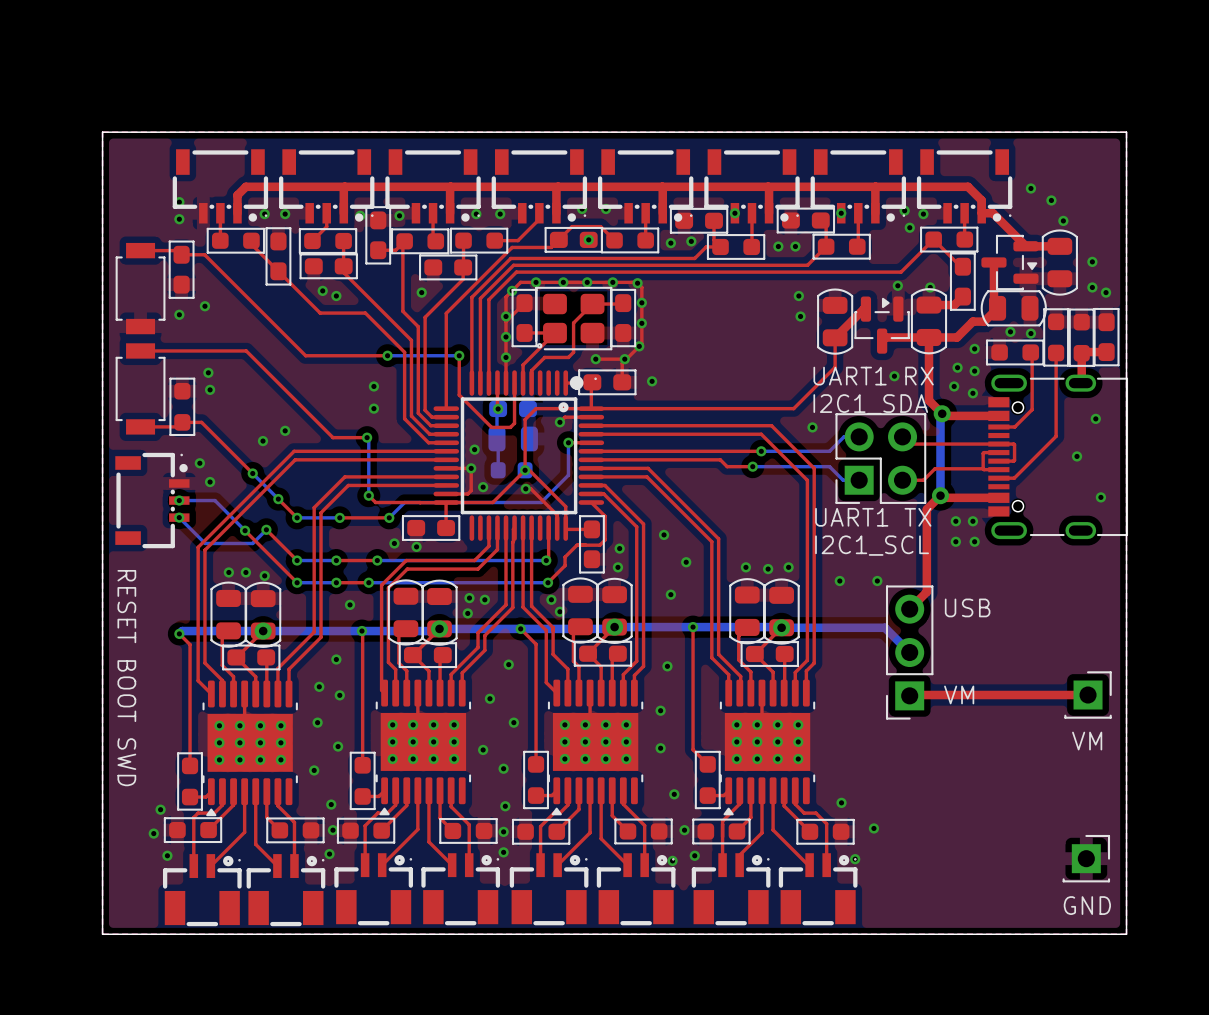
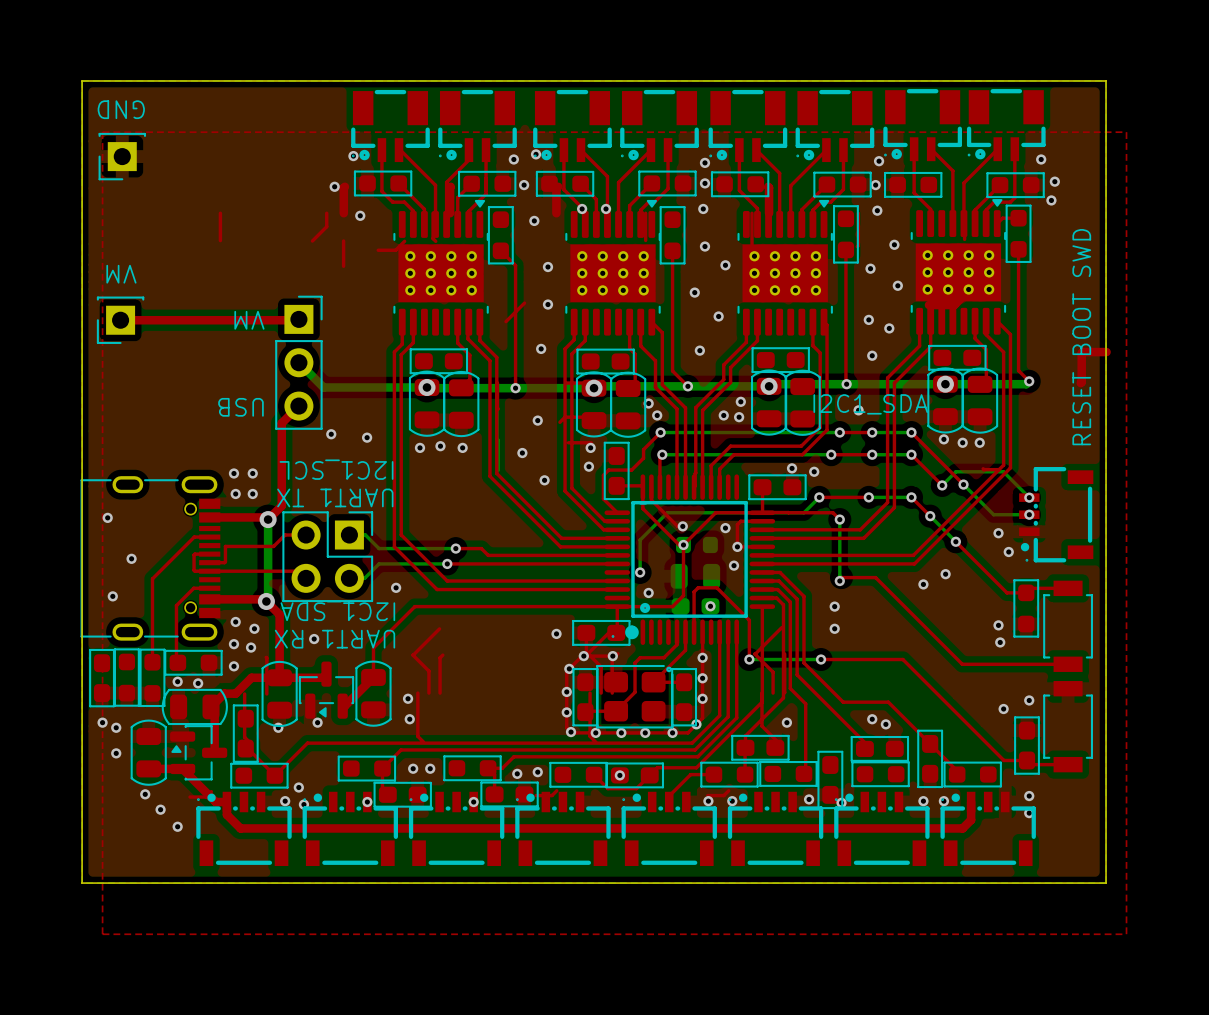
text: none -> GND (121, 109)
part: none -> (390, 125)
part: none -> (477, 125)
part: none -> (572, 125)
part: none -> (659, 125)
part: none -> (747, 125)
part: none -> (834, 125)
part: none -> (922, 125)
part: none -> (1006, 125)
board edge: (102, 132) (1126, 132) (1126, 934) (102, 934) (102, 132) -> (82, 80) (1106, 80) (1106, 883) (82, 883) (82, 80)
part footprint: [704, 149, 800, 224] -> [710, 171, 770, 198]
part footprint: [810, 149, 907, 224] -> [813, 171, 872, 198]
top track: none -> (914, 149) (914, 192) (930, 209) (930, 223)
top track: none -> (931, 149) (952, 170) (952, 223)
top track: none -> (997, 149) (963, 183) (963, 223)
top track: none -> (1014, 149) (1014, 197) (1010, 202) (994, 202) (986, 210) (986, 223)
top track: none -> (381, 150) (381, 191) (392, 202) (404, 202) (413, 211) (413, 224)
top track: none -> (399, 150) (435, 185) (435, 224)
top track: none -> (468, 150) (468, 160) (446, 182) (446, 224)
top track: none -> (486, 150) (486, 194) (468, 211) (468, 224)
top track: none -> (563, 150) (563, 189) (585, 211) (585, 224)
top track: none -> (581, 150) (607, 176) (607, 224)
top track: none -> (650, 150) (618, 182) (618, 224)
top track: none -> (668, 150) (668, 188) (654, 202) (648, 202) (640, 210) (640, 224)
top track: none -> (739, 150) (739, 190) (757, 208) (757, 224)
top track: none -> (756, 150) (779, 173) (779, 224)
top track: none -> (826, 150) (790, 185) (790, 224)
top track: none -> (843, 150) (843, 189) (830, 202) (821, 202) (812, 210) (812, 224)
via: none -> (536, 154)
part: none -> (122, 156)
via: none -> (353, 156)
via: none -> (513, 159)
via: none -> (1041, 159)
via: none -> (879, 161)
via: none -> (704, 162)
via: none -> (1054, 181)
part: none -> (383, 183)
top track: none -> (398, 183) (424, 209) (424, 224)
top track: none -> (471, 183) (457, 197) (457, 224)
part: none -> (487, 183)
part: none -> (565, 183)
top track: none -> (580, 183) (596, 199) (596, 224)
top track: none -> (651, 183) (629, 205) (629, 224)
part: none -> (667, 183)
via: none -> (704, 183)
top track: none -> (826, 184) (801, 209) (801, 224)
part: none -> (913, 184)
via: none -> (524, 185)
via: none -> (875, 185)
top track: none -> (1000, 185) (975, 210) (975, 223)
part: none -> (1015, 185)
part: (220, 186) -> none
part: (326, 186) -> none
via: none -> (334, 186)
part: (433, 186) -> none
part: (539, 186) -> none
part: (645, 186) -> none
top track: (662, 186) (662, 213) -> none
top track: (875, 186) (875, 213) -> none
part: (964, 186) -> none
via: (1030, 188) -> none
via: (179, 202) -> none
via: none -> (703, 208)
via: none -> (877, 210)
via: (904, 210) -> none
top track: (237, 213) (237, 195) (245, 186) (968, 186) (981, 200) (981, 213) (992, 213) (1026, 246) (1059, 246) -> none
top track: (539, 213) (539, 219) (517, 240) (494, 240) -> none
via: (734, 213) -> none
via: (841, 213) -> none
via: (264, 214) -> none
via: (285, 214) -> none
via: (476, 214) -> none
via: (500, 214) -> none
via: (923, 214) -> none
via: (399, 215) -> none
top track: none -> (1018, 218) (1002, 218) (997, 223)
via: (179, 219) -> none
via: none -> (534, 220)
part: (699, 220) -> none
top track: (714, 220) (714, 240) (720, 246) (706, 246) (694, 258) (510, 258) (471, 297) (471, 383) -> none
part: (805, 220) -> none
top track: (820, 220) (826, 225) (826, 246) (807, 265) (513, 265) (480, 298) (480, 383) -> none
via: (1063, 220) -> none
via: (909, 227) -> none
part: none -> (1018, 233)
part: (378, 235) -> none
part: none -> (672, 235)
part: (573, 239) -> none
via: (588, 239) -> none
part: (949, 239) -> none
part: (235, 240) -> none
top track: (251, 240) (251, 244) (320, 313) (365, 313) (404, 352) (404, 418) (428, 442) (446, 442) -> none
top track: (463, 240) (463, 279) (425, 317) (425, 410) (431, 417) (446, 417) -> none
part rotation: 0° (479, 240) -> 90° clockwise (500, 235)
top track: (614, 240) (600, 226) (572, 226) (551, 247) (512, 247) (446, 313) (446, 408) -> none
part: (630, 240) -> none
part: (328, 241) -> none
top track: (402, 241) (402, 311) (418, 326) (418, 413) (430, 425) (446, 425) -> none
part: (420, 241) -> none
via position: (691, 241) -> (704, 246)
via: (670, 243) -> none
via: none -> (894, 244)
part: (736, 246) -> none
via: (778, 246) -> none
via: (795, 246) -> none
part rotation: 0° (841, 246) -> 90° clockwise (845, 234)
top track: none -> (845, 249) (846, 384)
top track: none -> (1018, 249) (1018, 370) (1029, 381)
top track: (140, 250) (177, 250) (181, 254) (204, 254) (305, 355) (387, 355) -> none
top track: none -> (500, 250) (515, 265) (515, 388)
top track: none -> (672, 250) (672, 370) (687, 386)
part footprint: [419, 254, 478, 281] -> [393, 199, 489, 336]
part: (278, 256) -> none
via: (1092, 261) -> none
top track: (993, 262) (993, 304) (997, 308) (984, 321) (972, 321) (957, 337) (885, 337) (882, 341) -> none
part: (1009, 262) -> none
part: (1059, 262) -> none
via: none -> (725, 265)
part: (328, 266) -> none
top track: (343, 266) (343, 272) (411, 340) (411, 416) (429, 434) (446, 434) -> none
part: none -> (958, 266)
top track: (962, 266) (933, 239) (901, 272) (516, 272) (488, 299) (488, 383) -> none
via: none -> (547, 267)
part: none -> (613, 267)
part: none -> (785, 267)
via: none -> (870, 268)
part: (181, 269) -> none
text: none -> VM (121, 274)
part: (962, 281) -> none
via: (536, 282) -> none
via: (563, 282) -> none
via: (587, 282) -> none
via: (612, 282) -> none
via: (637, 283) -> none
via: (930, 287) -> none
via: (1092, 287) -> none
part: (140, 288) -> none
via: (322, 290) -> none
via: (512, 290) -> none
via: (421, 292) -> none
via: none -> (694, 292)
via: (1106, 292) -> none
via: (336, 296) -> none
via: (798, 296) -> none
via: (641, 302) -> none
top track: (623, 303) (592, 304) (573, 322) (573, 352) -> (585, 322) (585, 340) (573, 352)
via: none -> (547, 304)
via: (204, 306) -> none
part: (1013, 308) -> none
top track: (865, 309) (835, 337) (835, 367) (793, 408) (536, 408) (525, 419) (525, 470) -> none
via: (179, 314) -> none
via: (506, 316) -> none
via: none -> (718, 316)
via: (800, 316) -> none
part: (524, 318) -> none
part rotation: 0° (573, 318) -> 180° (634, 696)
part position: (573, 318) -> (634, 696)
part: (623, 318) -> none
top track: none -> (298, 319) (120, 320)
via: none -> (868, 319)
part: none -> (120, 320)
text: none -> VM (249, 320)
part: (835, 321) -> none
top track: none -> (919, 321) (919, 345) (887, 377) (887, 502) (860, 529) (762, 529)
part: (928, 321) -> none
top track: none -> (930, 321) (930, 346) (894, 383) (894, 507) (863, 538) (762, 538)
top track: none -> (975, 321) (975, 338) (986, 349) (986, 378) (980, 384)
top track: none -> (986, 321) (986, 334) (1003, 352) (1003, 465) (913, 555) (762, 555)
top track: none -> (997, 321) (1010, 334) (1010, 467) (914, 563) (762, 563)
top track: none -> (402, 322) (402, 344) (394, 352) (394, 546) (437, 589) (617, 589)
top track: none -> (413, 322) (413, 342) (401, 354) (401, 534) (447, 581) (617, 581)
top track: none -> (457, 322) (457, 343) (469, 355) (469, 379) (461, 387)
top track: none -> (468, 322) (467, 338) (489, 360) (489, 476) (560, 546) (617, 546)
top track: none -> (479, 322) (479, 340) (496, 357) (496, 473) (561, 538) (617, 538)
top track: none -> (574, 322) (574, 339) (565, 348) (565, 491) (603, 529) (617, 529)
top track: none -> (629, 322) (629, 348) (635, 354) (635, 381) (628, 388)
top track: none -> (640, 322) (640, 346) (655, 360) (655, 387) (677, 409) (677, 487)
top track: none -> (651, 322) (662, 332) (662, 384) (685, 407) (685, 487)
top track: none -> (746, 322) (746, 342) (723, 364) (723, 379) (695, 407) (694, 487)
top track: none -> (757, 322) (757, 340) (730, 367) (730, 382) (702, 410) (702, 487)
top track: none -> (812, 322) (812, 345) (820, 352) (820, 427) (801, 446) (730, 446) (711, 465) (711, 487)
top track: none -> (824, 322) (827, 325) (827, 430) (802, 454) (734, 454) (719, 469) (719, 487)
via: (641, 323) -> none
part: (882, 325) -> none
via: none -> (889, 328)
via: (1010, 331) -> none
top track: (524, 332) (554, 332) (523, 364) (523, 383) -> none
via: (1030, 333) -> none
via: (506, 336) -> none
top track: (928, 337) (928, 400) (944, 415) (998, 415) -> none
part: (1056, 337) -> none
part: (1081, 337) -> none
text: none -> RESET BOOT SWD (1081, 337)
part: (1106, 337) -> none
via: (639, 346) -> none
via: none -> (541, 348)
via: (974, 348) -> none
top track: (140, 350) (246, 350) (332, 437) (367, 437) -> none
via: none -> (699, 350)
part: (1015, 352) -> none
top track: (1030, 352) (1032, 409) (1014, 426) (998, 426) -> none
top track: (1056, 352) (1056, 436) (1014, 478) (998, 478) -> none
top track: (571, 354) (568, 357) (544, 357) (531, 370) (531, 383) -> (571, 354) (571, 488) (604, 521) (617, 521)
bottom track: (387, 355) (459, 355) -> none
via: (387, 355) -> none
top track: (459, 355) (459, 394) (491, 427) (510, 427) (514, 423) (514, 383) -> none
via: (459, 355) -> none
via: none -> (872, 355)
via: (506, 357) -> none
part: none -> (957, 357)
top track: (595, 359) (626, 359) -> (582, 656) (612, 656)
via: (595, 359) -> none
via: (624, 359) -> none
part: none -> (780, 360)
part: none -> (438, 361)
bottom track: none -> (298, 362) (323, 387) (594, 388) (595, 386) (769, 386) (771, 384) (1026, 384) (1029, 381)
part: none -> (298, 362)
via: (957, 367) -> none
via: (974, 371) -> none
via: (208, 372) -> none
text: UART1 RX (873, 376) -> none
via: (894, 376) -> none
via: (652, 381) -> none
via: none -> (1029, 381)
top track: (592, 382) (591, 408) -> none
part position: (607, 382) -> (605, 361)
top track: (622, 382) (622, 363) (641, 343) (641, 287) (636, 282) (520, 282) (506, 297) (506, 383) -> none
via: none -> (846, 384)
via: (373, 386) -> none
via: none -> (687, 386)
via: none -> (769, 386)
via: (954, 386) -> none
via: none -> (426, 387)
part: (140, 388) -> none
via: none -> (515, 388)
via: none -> (594, 388)
via: (210, 389) -> none
via: (972, 393) -> none
part: none -> (945, 400)
part: none -> (980, 400)
via: none -> (740, 401)
part: none -> (769, 402)
part: none -> (802, 402)
part: none -> (426, 403)
via: none -> (648, 403)
part: none -> (461, 404)
part: none -> (594, 404)
part: none -> (628, 404)
part: (182, 406) -> none
top track: none -> (298, 406) (281, 423) (281, 505) (268, 519) (265, 517) (209, 517)
text: none -> USB (240, 407)
via: (373, 408) -> none
via: (498, 408) -> none
part position: (513, 408) -> (695, 606)
via: none -> (858, 410)
bottom track: (942, 413) (940, 415) (940, 495) -> none
via position: (942, 413) -> (945, 384)
via: none -> (657, 415)
via: none -> (723, 415)
via: none -> (739, 417)
via: (1095, 418) -> none
via: none -> (537, 420)
via: (559, 422) -> none
top track: (591, 425) (771, 425) (814, 468) (814, 663) (806, 671) (806, 693) -> none
top track: (140, 426) (177, 426) (182, 422) (201, 422) (252, 473) -> none
via: (812, 427) -> none
via: (285, 430) -> none
top track: none -> (660, 432) (643, 449) (643, 458) (631, 470) (608, 470) (603, 475) (603, 498) (617, 512)
via: none -> (660, 432)
top track: none -> (839, 432) (872, 432)
via: none -> (839, 432)
bottom track: none -> (872, 432) (911, 432)
via: none -> (872, 432)
top track: none -> (911, 432) (963, 484)
via: none -> (911, 432)
via: none -> (331, 434)
top track: (591, 434) (761, 434) (807, 480) (807, 660) (795, 672) (795, 693) -> none
bottom track: (859, 436) (843, 436) (829, 451) (761, 451) -> none
top track: (902, 436) (909, 444) (1013, 444) (1014, 460) (998, 461) -> none
bottom track: (367, 437) (368, 439) (368, 495) -> none
part position: (513, 438) -> (695, 576)
via: none -> (943, 439)
via: (262, 441) -> none
bottom track: (568, 442) (568, 475) (541, 502) (404, 502) (389, 517) -> none
via: (568, 442) -> none
via: none -> (962, 442)
via: none -> (979, 442)
via: none -> (440, 446)
via: none -> (419, 447)
via: none -> (462, 447)
via: none -> (590, 447)
via: (474, 449) -> none
top track: (446, 451) (294, 451) (198, 547) (198, 680) (211, 693) -> none
top track: (591, 451) (761, 451) -> (447, 563) (617, 563)
via: (761, 451) -> none
top track: (998, 452) (983, 453) (983, 468) (934, 468) (923, 480) (902, 480) -> none
via: none -> (522, 453)
top track: none -> (662, 454) (659, 457) (659, 487)
via: none -> (662, 454)
top track: none -> (831, 454) (872, 454)
via: none -> (831, 454)
bottom track: none -> (872, 454) (911, 454)
via: none -> (872, 454)
top track: none -> (911, 454) (942, 485)
via: none -> (911, 454)
part rotation: 0° (518, 455) -> 180° (689, 559)
part position: (518, 455) -> (689, 559)
part: (1058, 456) -> none
via: (1077, 456) -> none
part: (880, 458) -> none
top track: (446, 459) (295, 459) (204, 550) (204, 663) (222, 680) (222, 693) -> none
top track: (591, 459) (720, 459) (727, 466) (752, 466) -> none
via: (199, 463) -> none
via: none -> (588, 466)
bottom track: (752, 466) (829, 466) (843, 480) (859, 480) -> none
via: (752, 466) -> none
top track: (446, 468) (471, 468) (471, 490) (467, 493) (446, 493) -> none
via: (471, 468) -> none
top track: (591, 468) (648, 468) (718, 538) (718, 654) (740, 676) (739, 693) -> none
via: none -> (792, 468)
part position: (511, 470) -> (696, 544)
top track: (525, 470) (492, 502) (446, 502) -> none
top track: (525, 470) (529, 470) (565, 506) (567, 529) (591, 529) -> none
via: (525, 470) -> none
part: none -> (616, 470)
via: none -> (814, 471)
via: none -> (233, 473)
bottom track: (252, 473) (278, 499) -> none
top track: (446, 476) (344, 476) (314, 507) (314, 632) (277, 668) (277, 693) -> none
top track: (591, 476) (646, 476) (711, 541) (711, 657) (728, 674) (728, 693) -> none
via: none -> (544, 480)
via: (210, 482) -> none
bottom track: none -> (963, 484) (993, 514) (1029, 514)
via: none -> (963, 484)
top track: (446, 485) (348, 485) (321, 512) (321, 637) (289, 669) (289, 693) -> none
top track: (591, 485) (604, 485) (643, 524) (643, 666) (634, 675) (634, 693) -> none
top track: none -> (616, 485) (641, 485) (642, 508) (679, 544) (683, 544)
bottom track: none -> (942, 485) (955, 471) (1003, 471) (1029, 497)
via: (483, 487) -> none
top track: none -> (651, 487) (651, 500) (677, 526) (682, 526)
top track: none -> (762, 487) (762, 512) (788, 512)
part: none -> (777, 487)
via size: [931, 487, 950, 505] -> [937, 480, 948, 491]
top track: (525, 488) (530, 488) (557, 515) (557, 528) -> none
via: (525, 488) -> none
via: none -> (235, 493)
via: none -> (252, 493)
top track: (591, 493) (603, 493) (636, 526) (636, 661) -> (677, 632) (677, 644) (663, 657) (640, 657) (636, 661)
top track: (368, 495) (375, 502) (419, 502) -> none
via: (368, 495) -> none
top track: none -> (819, 497) (868, 497)
bottom track: none -> (819, 497) (803, 512) (667, 512) (640, 540) (640, 572)
via: none -> (819, 497)
bottom track: none -> (868, 497) (911, 497)
via: none -> (868, 497)
top track: none -> (911, 497) (930, 516)
via: none -> (911, 497)
top track: (998, 497) (942, 497) (940, 495) (926, 509) (926, 592) (909, 609) -> none
via: none -> (1029, 497)
via: (1100, 497) -> none
top track: (278, 499) (297, 517) -> none
via: (278, 499) -> none
part: (152, 500) -> none
bottom track: (179, 500) (214, 500) (245, 530) -> none
via: (179, 500) -> none
top track: (420, 502) (446, 502) (446, 528) -> none
top track: (591, 502) (605, 516) (605, 539) (599, 545) (576, 545) (565, 557) (565, 565) (547, 582) -> none
top track: none -> (762, 512) (715, 512) (683, 544)
top track: none -> (788, 512) (832, 512) (839, 519)
via: none -> (1029, 514)
part: none -> (1056, 514)
bottom track: none -> (930, 516) (955, 541)
via: none -> (930, 516)
via: none -> (107, 517)
bottom track: (179, 517) (205, 543) (252, 543) (266, 529) -> none
via: (179, 517) -> none
bottom track: (297, 517) (339, 517) -> none
via: (297, 517) -> none
top track: (339, 517) (389, 517) -> none
via: (339, 517) -> none
via: (389, 517) -> none
text rotation: 0° (873, 517) -> 180° (335, 497)
text position: UART1 TX (873, 517) -> UART1 TX (335, 497)
bottom track: none -> (268, 519) (268, 599) (266, 601)
bottom track: none -> (839, 519) (839, 575) (841, 577)
via: none -> (839, 519)
top track: none -> (762, 521) (740, 521) (737, 524) (737, 546) (762, 546)
via: (955, 521) -> none
via: (972, 521) -> none
via size: [261, 524, 272, 535] -> [259, 511, 277, 529]
via: none -> (682, 526)
part: (431, 528) -> none
top track: (488, 528) (488, 546) (474, 560) (406, 560) (381, 585) (381, 690) (384, 693) -> none
top track: (497, 528) (497, 549) (478, 569) (407, 569) (388, 587) (388, 662) (395, 669) (395, 693) -> none
top track: (506, 528) (506, 604) (478, 632) (478, 647) (451, 674) (451, 693) -> none
top track: (514, 528) (512, 607) (484, 635) (484, 650) (462, 673) (462, 693) -> none
top track: (523, 528) (523, 607) (546, 630) (546, 682) (556, 693) -> none
top track: (531, 528) (531, 606) (553, 627) (553, 654) (567, 669) (567, 693) -> none
top track: (548, 528) (548, 558) (546, 560) -> none
via: none -> (725, 528)
top track: (266, 529) (297, 560) -> none
top track: (245, 530) (297, 582) -> none
via: (245, 530) -> none
via: none -> (998, 533)
via: (664, 534) -> none
top track: none -> (306, 535) (285, 535) (273, 546) (225, 546) (225, 561) (209, 562)
bottom track: none -> (349, 535) (365, 535) (379, 548) (455, 548)
top track: none -> (209, 537) (194, 537) (152, 578) (152, 662)
top track: none -> (955, 541) (1006, 592) (1026, 592) (1030, 588) (1068, 588)
via: (974, 541) -> none
via: (394, 543) -> none
part: (591, 544) -> none
top track: none -> (683, 544) (683, 595) (672, 606) (414, 606) (373, 648) (373, 677) (342, 706)
via: none -> (683, 544)
text rotation: 0° (872, 545) -> 180° (336, 469)
text position: I2C1_SCL (872, 545) -> I2C1_SCL (336, 469)
via: (416, 546) -> none
via: none -> (737, 546)
top track: none -> (455, 548) (481, 548) (488, 555) (617, 555)
via: none -> (455, 548)
via: (619, 548) -> none
via: none -> (1008, 552)
top track: none -> (209, 554) (194, 554) (194, 571) (298, 571) (306, 578)
part: none -> (327, 556)
via: none -> (131, 558)
part: none -> (150, 558)
bottom track: (297, 560) (336, 560) -> none
via: (297, 560) -> none
top track: (336, 560) (377, 560) -> none
via: (336, 560) -> none
bottom track: (377, 560) (546, 560) -> (662, 454) (831, 454)
via: (377, 560) -> none
via: (546, 560) -> none
via: (686, 562) -> none
bottom track: none -> (447, 563) (379, 563) (364, 578) (349, 578)
via: none -> (447, 563)
via: none -> (734, 565)
via: (617, 567) -> none
via: (745, 567) -> none
via: (788, 567) -> none
via: (768, 569) -> none
via: (228, 572) -> none
via: (245, 572) -> none
via: none -> (640, 572)
top track: none -> (762, 572) (780, 572) (803, 596) (803, 662) (843, 702) (888, 702) (957, 770) (957, 774)
via: none -> (945, 574)
via: (264, 575) -> none
top track: none -> (841, 577) (875, 577) (962, 664) (1068, 664)
top track: none -> (762, 581) (778, 581) (797, 599) (797, 674) (864, 742) (864, 748)
via: (877, 581) -> none
bottom track: (297, 582) (336, 582) -> none
via: (297, 582) -> none
top track: (336, 582) (368, 582) -> none
via: (336, 582) -> none
bottom track: (368, 582) (547, 582) -> (660, 432) (839, 432)
via: (368, 582) -> none
via: (547, 582) -> none
via: none -> (923, 584)
via: none -> (396, 587)
top track: none -> (209, 588) (193, 588) (176, 605) (177, 662)
top track: none -> (762, 589) (777, 589) (790, 602) (790, 688) (805, 703) (805, 773)
via: none -> (648, 592)
via: (670, 594) -> none
via: none -> (112, 596)
via: (469, 598) -> none
top track: none -> (762, 598) (776, 598) (783, 604) (783, 697) (745, 735) (745, 774)
top track: none -> (209, 599) (264, 599) (279, 614) (279, 677)
via: (484, 599) -> none
via: (551, 599) -> none
via: (350, 604) -> none
top track: none -> (617, 606) (616, 632)
via: none -> (710, 606)
top track: none -> (762, 606) (762, 701) (696, 767) (657, 767) (636, 788) (607, 788) (594, 774)
via: none -> (834, 606)
text: USB (967, 607) -> none
part: none -> (1026, 608)
text: none -> I2C1_SDA (337, 610)
part: (580, 610) -> none
part: (614, 610) -> none
via: (559, 611) -> none
part: (747, 611) -> none
part: (781, 611) -> none
part: (405, 612) -> none
part: (439, 612) -> none
via: (467, 613) -> none
part: (228, 614) -> none
part: (263, 614) -> none
via: none -> (235, 621)
via: none -> (998, 625)
top track: (580, 626) (573, 633) (573, 661) (578, 666) (578, 693) -> none
part: none -> (1068, 626)
via: (614, 627) -> none
top track: (693, 627) (693, 749) (707, 764) -> none
via: (693, 627) -> none
top track: (747, 627) (738, 635) (738, 659) (750, 672) (750, 693) -> none
via: (781, 627) -> none
via: none -> (254, 628)
top track: (405, 628) (398, 635) (398, 663) (406, 671) (406, 693) -> none
via: (439, 628) -> none
top track: (520, 628) (536, 644) (536, 764) -> none
via: (520, 628) -> none
via: none -> (834, 628)
top track: (228, 630) (222, 637) (222, 665) (233, 676) (233, 693) -> none
top track: (263, 631) (236, 657) (255, 676) (255, 693) -> none
via position: (263, 631) -> (266, 601)
top track: (361, 631) (362, 765) -> none
via: (361, 631) -> none
top track: none -> (685, 632) (685, 650) (653, 682) (684, 682)
top track: none -> (694, 632) (694, 591) (698, 587) (716, 587) (749, 620) (749, 659)
top track: none -> (702, 632) (702, 718) (687, 732) (571, 732) (566, 727) (566, 671) (586, 651) (586, 632)
top track: none -> (719, 632) (719, 715) (692, 743) (307, 743) (274, 775) (245, 748)
top track: none -> (728, 632) (728, 716) (694, 749) (401, 749) (382, 768) (382, 789) (387, 794)
top track: none -> (736, 632) (736, 717) (697, 756) (513, 756) (502, 768) (488, 768) (494, 774) (494, 794)
top track: (179, 633) (190, 644) (190, 765) -> none
bottom track: (179, 633) (182, 631) (437, 631) (439, 628) (612, 628) (614, 627) (884, 627) (909, 652) -> none
via: (179, 633) -> none
via: none -> (556, 633)
via: none -> (314, 639)
text: none -> UART1 RX (335, 639)
via: none -> (1000, 642)
via: none -> (233, 644)
via: none -> (251, 647)
part: (909, 652) -> none
part position: (602, 653) -> (601, 632)
part: (769, 654) -> none
part: (427, 655) -> none
via: none -> (583, 656)
via: none -> (612, 656)
part: (251, 657) -> none
via: none -> (702, 657)
via: (336, 659) -> none
bottom track: none -> (749, 659) (821, 659)
via: none -> (749, 659)
top track: none -> (821, 659) (902, 659) (1003, 760) (1027, 760) (1031, 764) (1068, 764)
via: none -> (821, 659)
part: none -> (193, 662)
top track: (635, 662) (623, 674) (623, 693) -> (635, 662) (635, 692) (616, 711) (585, 712)
via: (508, 664) -> none
via: none -> (233, 666)
via: (667, 666) -> none
via: none -> (569, 668)
top track: none -> (326, 674) (322, 677) (251, 677) (235, 693) (224, 693) (211, 706) (214, 710) (214, 752)
part: none -> (126, 677)
part: none -> (152, 677)
part: none -> (102, 678)
text: RESET BOOT SWD (126, 678) -> none
via: none -> (702, 678)
part footprint: [719, 679, 816, 816] -> [731, 734, 790, 761]
via: none -> (177, 681)
via: none -> (198, 683)
via: (319, 686) -> none
part: none -> (326, 690)
via: none -> (566, 691)
part: none -> (279, 693)
part: none -> (373, 693)
text: VM (959, 694) -> none
via: (339, 695) -> none
top track: (1088, 695) (909, 695) -> none
part: (1088, 695) -> none
part: none -> (585, 697)
part: none -> (684, 697)
via: none -> (408, 698)
via: (489, 698) -> none
via: none -> (702, 698)
via: none -> (1029, 700)
part: none -> (194, 706)
via: none -> (1003, 709)
via: (660, 710) -> none
via: none -> (566, 712)
via: none -> (409, 719)
via: none -> (872, 719)
via: none -> (102, 722)
via: (513, 722) -> none
via: none -> (786, 722)
via: none -> (696, 724)
via: none -> (885, 724)
part: none -> (1068, 726)
via: none -> (116, 727)
via: none -> (278, 727)
via: none -> (571, 732)
via: none -> (595, 732)
via: none -> (621, 732)
via: none -> (645, 732)
via: none -> (672, 732)
part: none -> (245, 733)
text: VM (1087, 741) -> none
part: none -> (1027, 745)
via: (338, 746) -> none
part: (423, 747) -> none
part: (595, 747) -> none
part: (250, 748) -> none
via: (660, 748) -> none
part: none -> (879, 748)
via: (483, 749) -> none
part: none -> (148, 752)
part: none -> (198, 752)
via: none -> (116, 753)
part: none -> (930, 758)
top track: none -> (148, 768) (182, 768) (215, 802) (226, 802) (226, 814) (240, 828) (962, 828) (971, 820) (971, 802)
via: none -> (413, 768)
via: none -> (430, 768)
part: none -> (472, 768)
via position: (503, 768) -> (517, 773)
via: (314, 770) -> none
via: none -> (537, 772)
part: none -> (788, 773)
part: none -> (578, 774)
top track: none -> (713, 774) (690, 774) (669, 796) (669, 802)
part: none -> (880, 774)
part: none -> (972, 774)
part: none -> (259, 775)
via: none -> (619, 775)
part: none -> (634, 775)
part: (536, 779) -> none
part: none -> (830, 779)
part rotation: 0° (362, 780) -> 90° clockwise (366, 768)
part rotation: 0° (707, 780) -> 90° clockwise (729, 774)
part: (190, 781) -> none
via: none -> (298, 787)
top track: (384, 790) (378, 796) (362, 796) -> none
top track: (395, 790) (395, 805) (387, 813) (377, 813) (365, 825) (365, 865) -> none
top track: (406, 790) (406, 805) (381, 830) -> none
top track: (417, 790) (417, 829) (382, 865) -> none
top track: (428, 790) (428, 841) (452, 865) -> none
top track: (440, 790) (440, 818) (452, 830) -> none
top track: (451, 790) (451, 806) (469, 824) (469, 865) -> none
top track: (567, 790) (567, 805) (559, 813) (553, 813) (540, 826) (540, 865) -> none
top track: (578, 790) (578, 809) (556, 831) -> none
top track: (590, 790) (590, 832) (557, 865) -> none
top track: (601, 790) (601, 838) (627, 865) -> none
top track: (612, 790) (612, 815) (627, 831) -> none
top track: (623, 790) (623, 804) (644, 825) (644, 865) -> none
top track: (739, 790) (739, 803) (722, 821) (722, 865) -> none
top track: (750, 790) (750, 817) (736, 831) -> none
top track: (761, 790) (761, 832) (739, 855) (739, 865) -> none
top track: (773, 790) (773, 830) (809, 865) -> none
top track: (784, 790) (784, 806) (809, 831) -> none
top track: (795, 790) (795, 804) (804, 813) (815, 813) (826, 823) (826, 865) -> none
top track: (222, 791) (222, 805) (214, 813) (198, 813) (193, 817) (193, 866) -> none
top track: (233, 791) (233, 805) (208, 830) -> none
top track: (244, 791) (244, 832) (210, 866) -> none
top track: (255, 791) (255, 844) (277, 866) -> none
top track: (266, 791) (266, 817) (279, 830) -> none
top track: (277, 791) (277, 805) (294, 822) (294, 866) -> none
via: none -> (145, 794)
part: none -> (402, 794)
part: none -> (509, 794)
via: (674, 794) -> none
via: none -> (1029, 796)
via: none -> (809, 799)
via: none -> (285, 801)
via: none -> (708, 801)
via: none -> (732, 801)
via: none -> (923, 801)
via: none -> (943, 801)
via: none -> (367, 802)
via: none -> (473, 802)
via: none -> (303, 804)
via: (331, 804) -> none
via: (505, 806) -> none
via: none -> (1029, 813)
part footprint: [336, 817, 396, 844] -> [302, 791, 399, 867]
part footprint: [439, 818, 498, 844] -> [408, 791, 505, 867]
via: none -> (177, 826)
part: none -> (243, 828)
part: none -> (562, 828)
part: none -> (669, 828)
part: none -> (775, 828)
via: (873, 828) -> none
part: none -> (881, 828)
part: none -> (988, 828)
part: (193, 830) -> none
part: (295, 830) -> none
via: (332, 830) -> none
via: (684, 830) -> none
via: (503, 831) -> none
part: (541, 831) -> none
part: (643, 831) -> none
part: (721, 831) -> none
part: (825, 831) -> none
via: (153, 833) -> none
via: (503, 852) -> none
via: (329, 854) -> none
via: (167, 855) -> none
via: (694, 855) -> none
part: (1086, 858) -> none
via: (855, 859) -> none
via: (672, 860) -> none
part: (373, 889) -> none
part: (460, 889) -> none
part: (549, 889) -> none
part: (636, 889) -> none
part: (731, 889) -> none
part: (818, 889) -> none
part: (202, 890) -> none
part: (285, 890) -> none
text: GND (1087, 905) -> none

